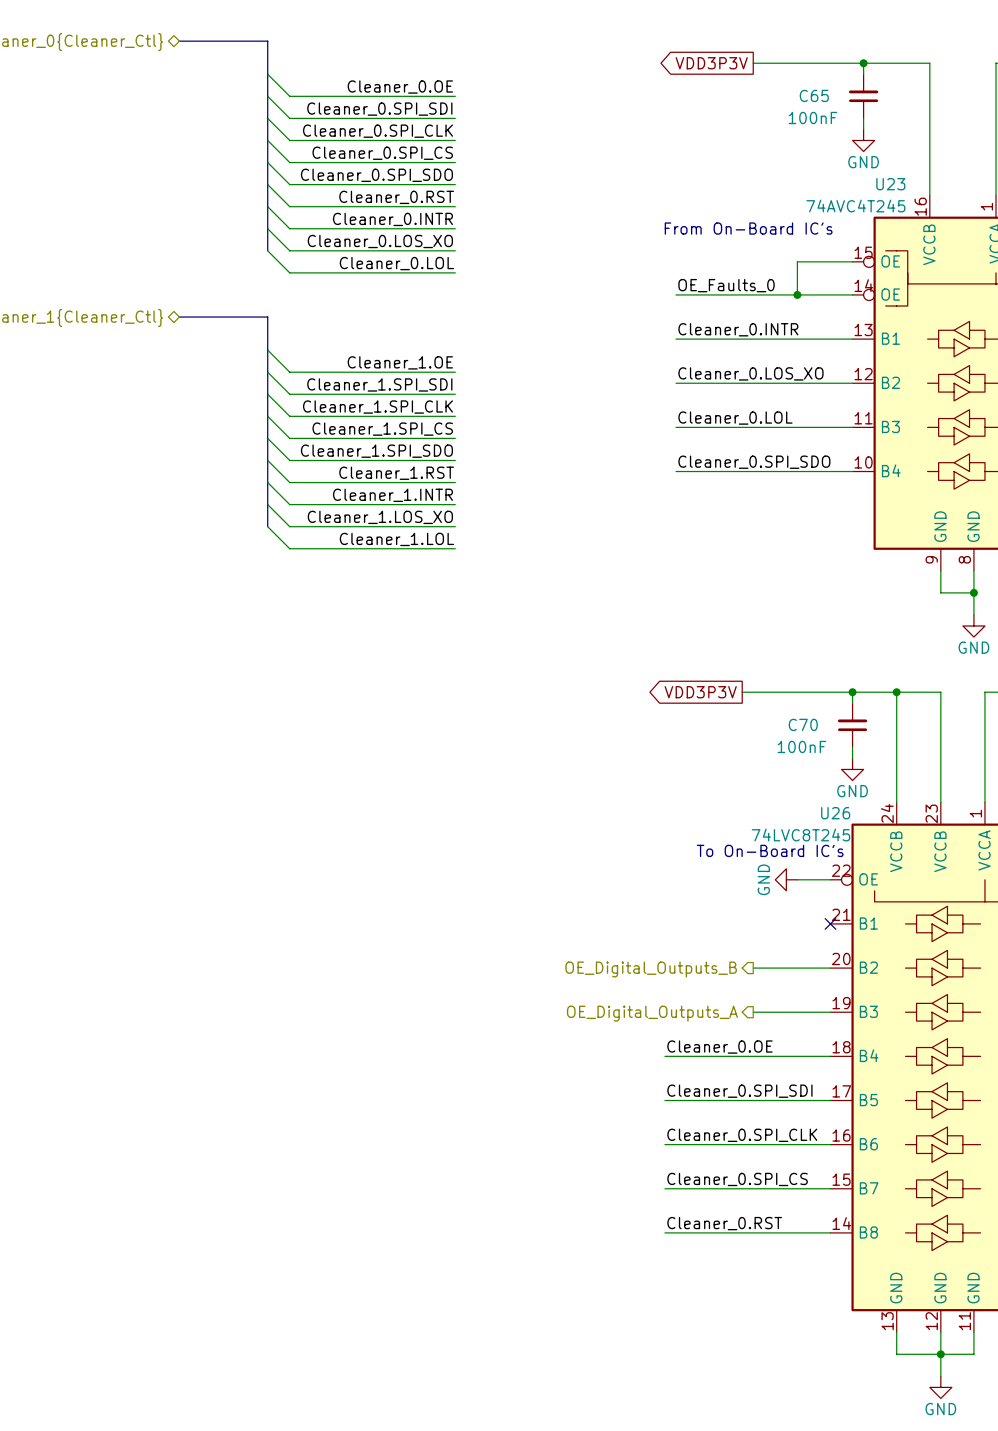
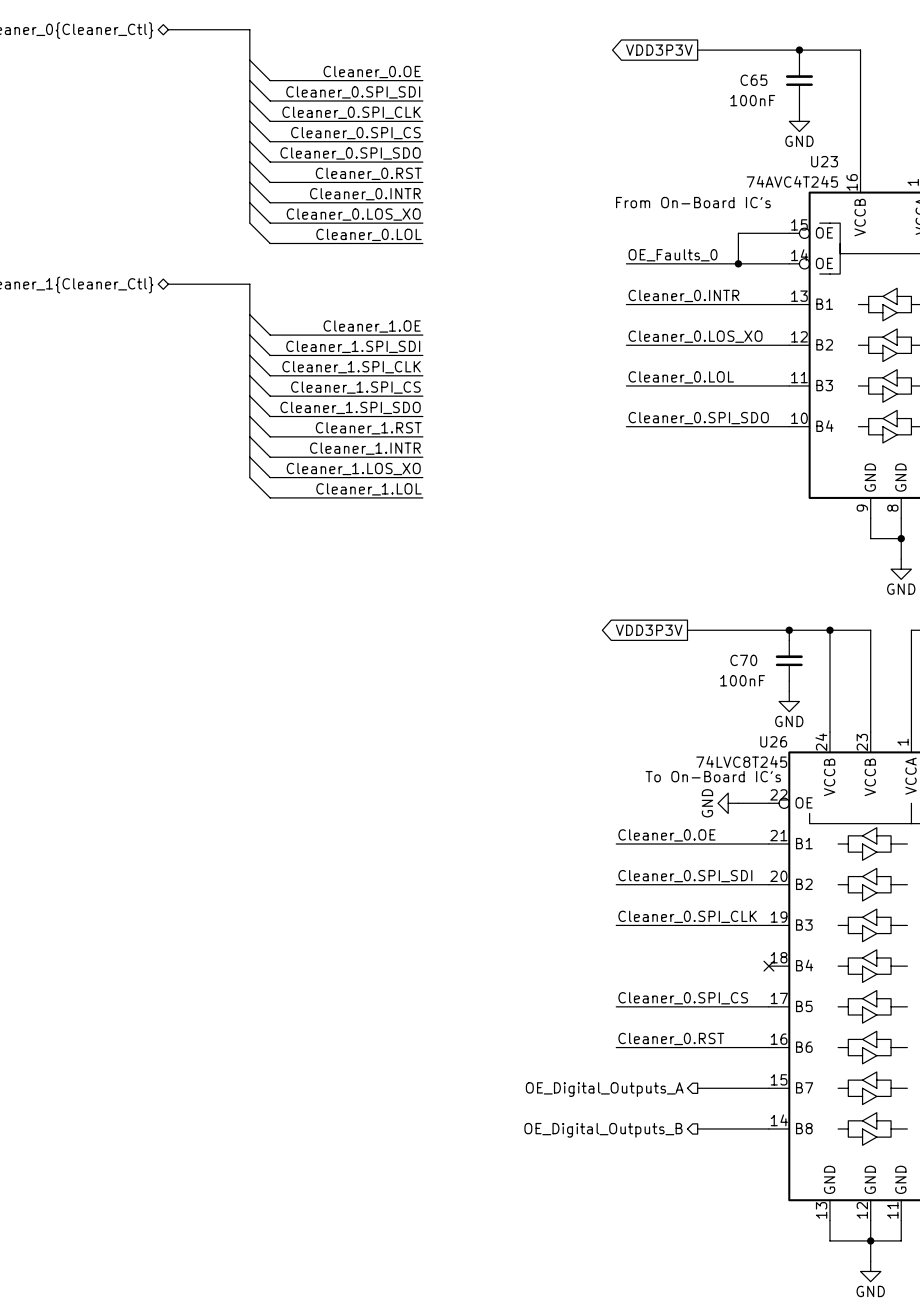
no-connect mark: (830, 923) -> none
label: none -> Cleaner_0.SPI_SDI (685, 876)
wire: none -> (616, 884) (697, 884)
hierarchical label: OE_Digital_Outputs_B (651, 969) -> none
label: none -> Cleaner_0.SPI_CLK (687, 916)
hierarchical label position: OE_Digital_Outputs_A (652, 1013) -> OE_Digital_Outputs_A (604, 1089)
label position: Cleaner_0.OE (719, 1047) -> Cleaner_0.OE (666, 835)
wire: (664, 1056) (830, 1056) -> (616, 843) (768, 843)
no-connect mark: none -> (768, 966)
label: Cleaner_0.SPI_SDI (739, 1091) -> Cleaner_0.SPI_CS (683, 998)
label: Cleaner_0.SPI_CLK (742, 1135) -> Cleaner_0.RST (671, 1038)
label: Cleaner_0.SPI_CS (737, 1179) -> none
wire: (664, 1188) (753, 1188) -> (616, 925) (697, 925)
label: Cleaner_0.RST (724, 1223) -> none
wire: (664, 1232) (753, 1232) -> none
hierarchical label: none -> OE_Digital_Outputs_B (603, 1130)

